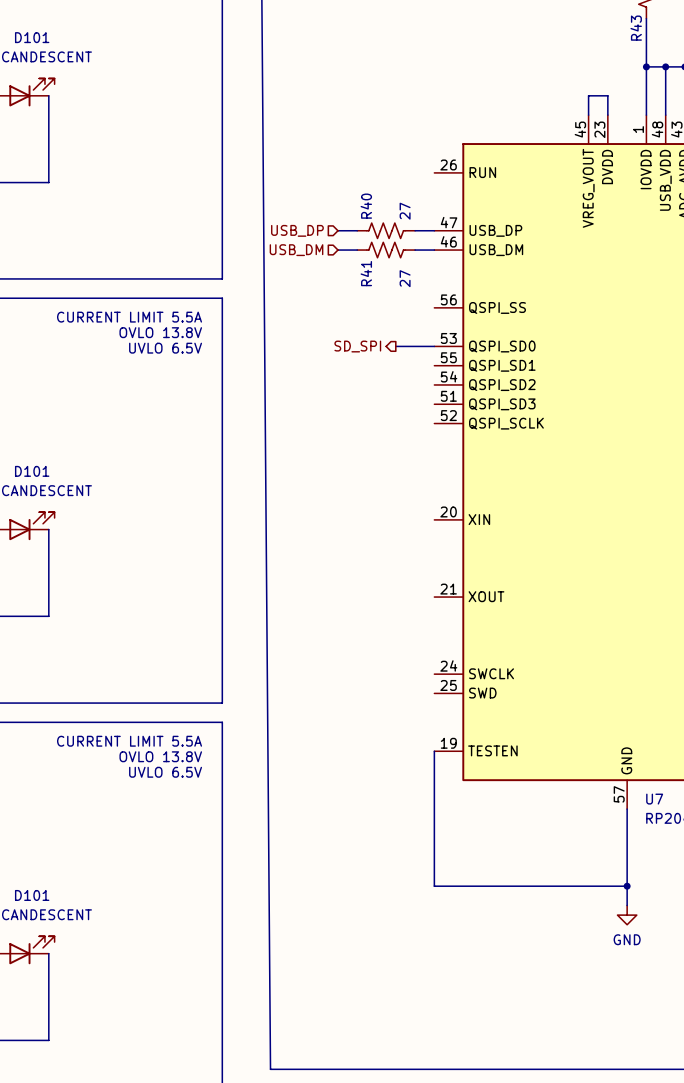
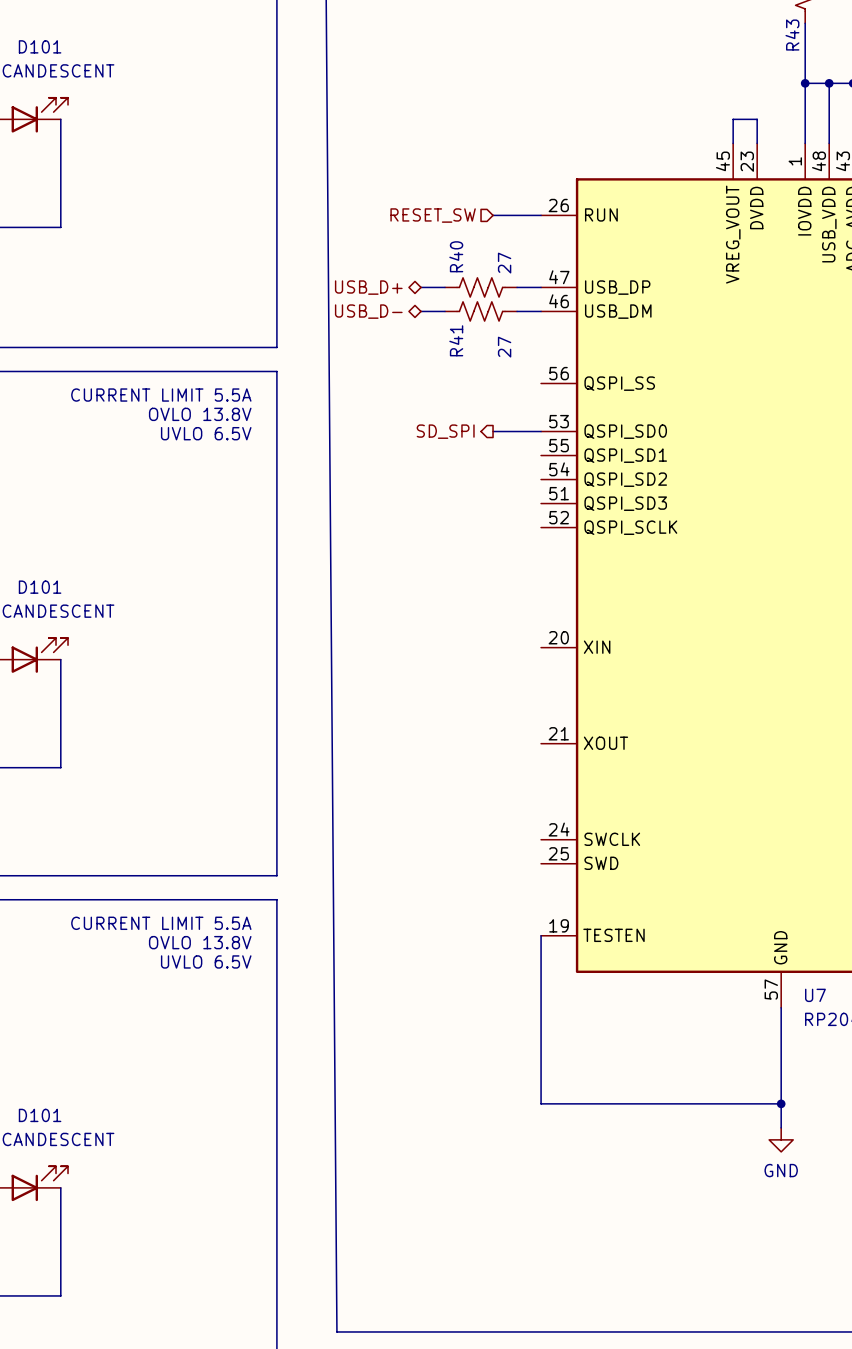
wire: none -> (493, 215) (541, 215)
hierarchical label: none -> RESET_SW (433, 215)
hierarchical label shape: input (297, 230) -> bidirectional (368, 287)
hierarchical label: USB_DP (297, 230) -> USB_D+ (368, 287)
hierarchical label shape: input (296, 250) -> bidirectional (368, 311)
hierarchical label: USB_DM (296, 250) -> USB_D- (368, 311)

